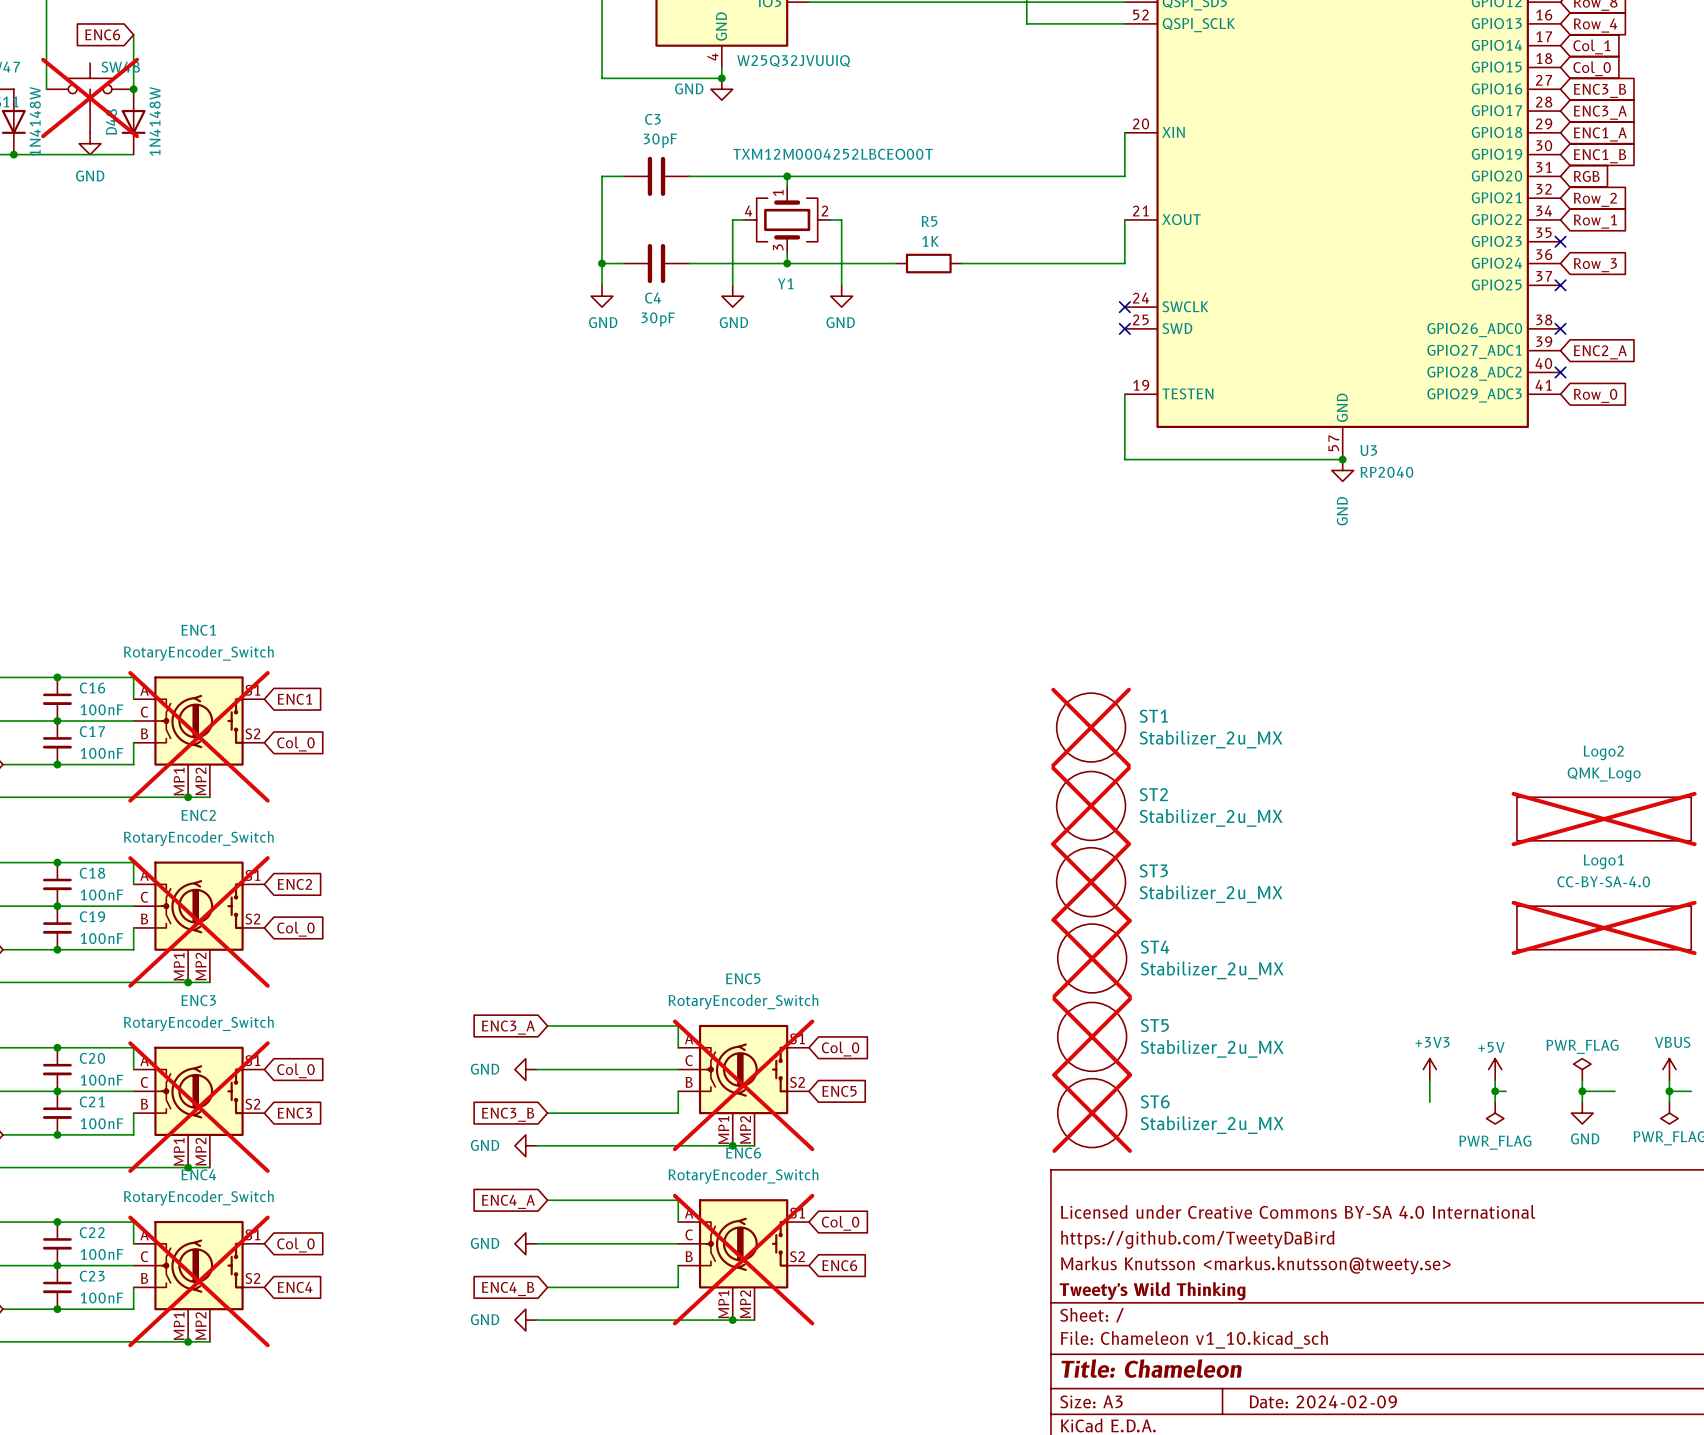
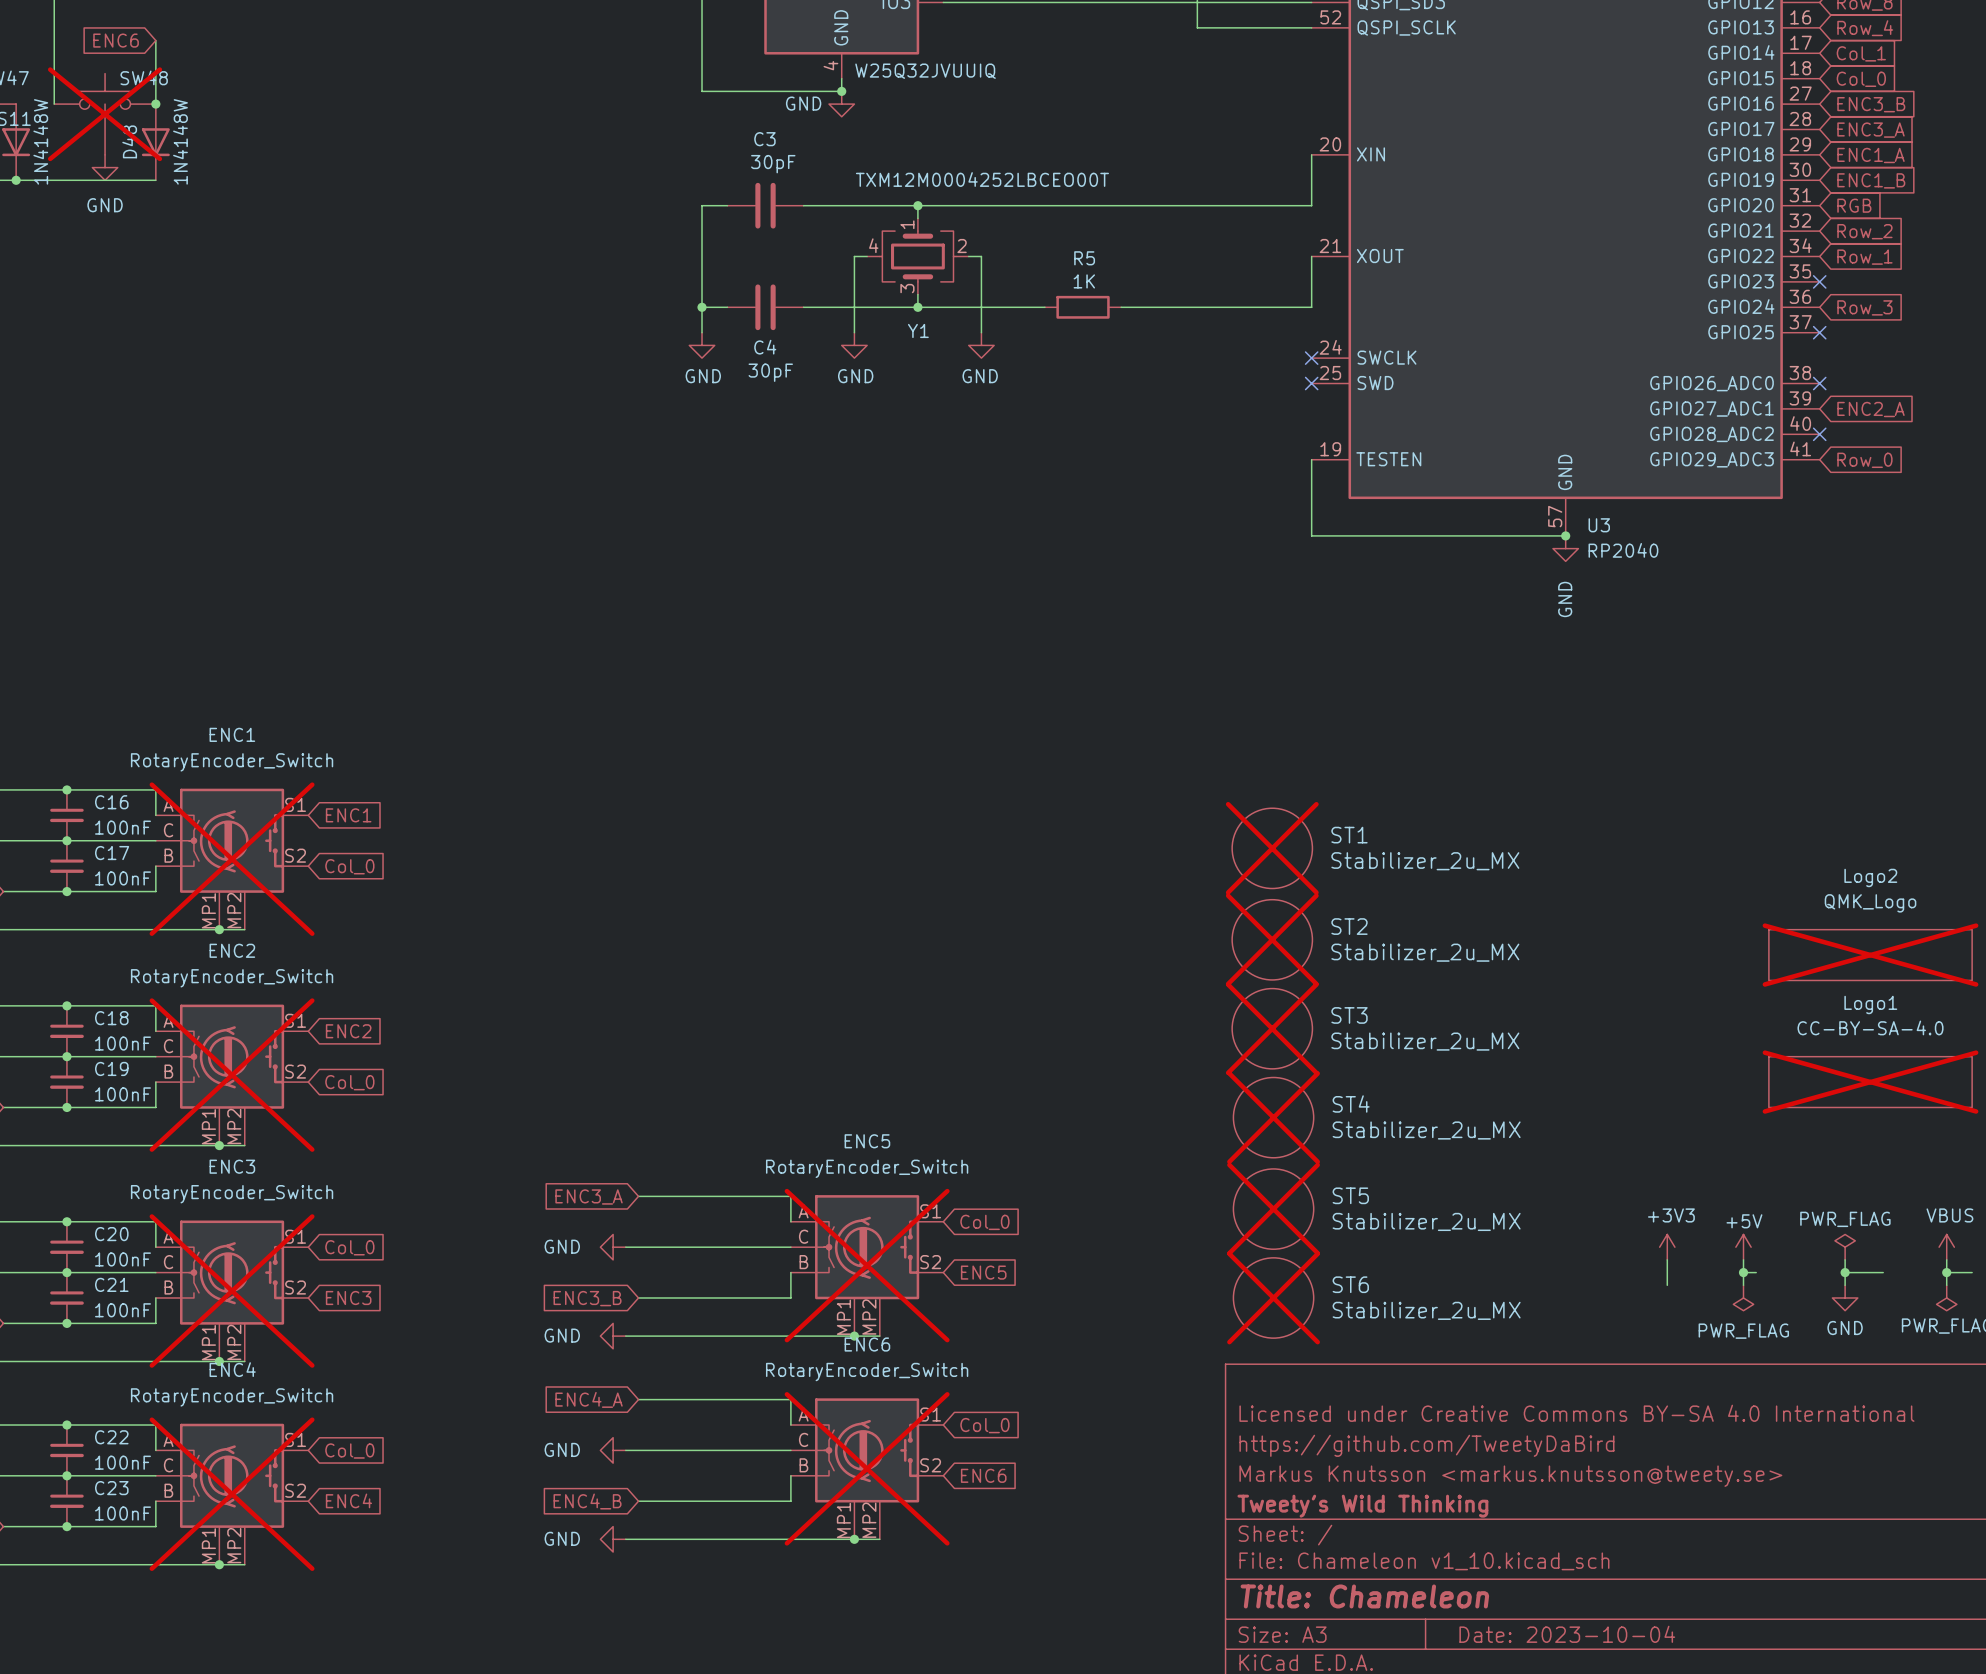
title block: Date: 2024-02-09 (1323, 1401) -> Date: 2023-10-04 (1567, 1634)

